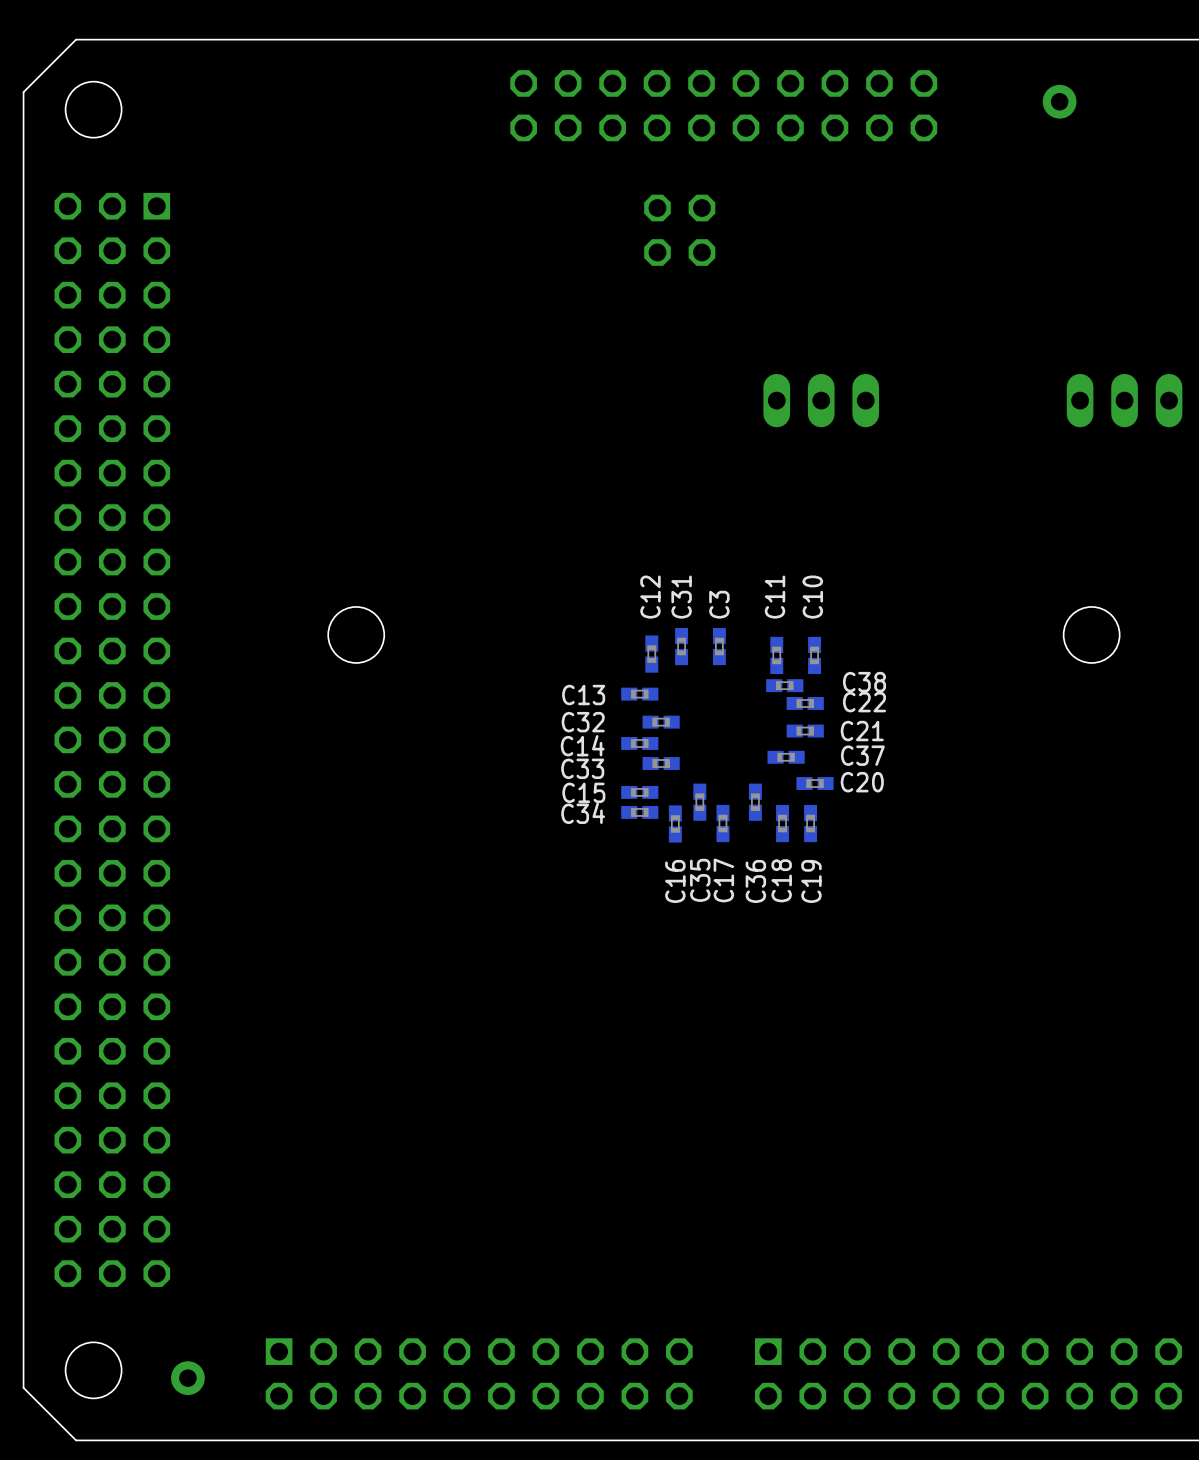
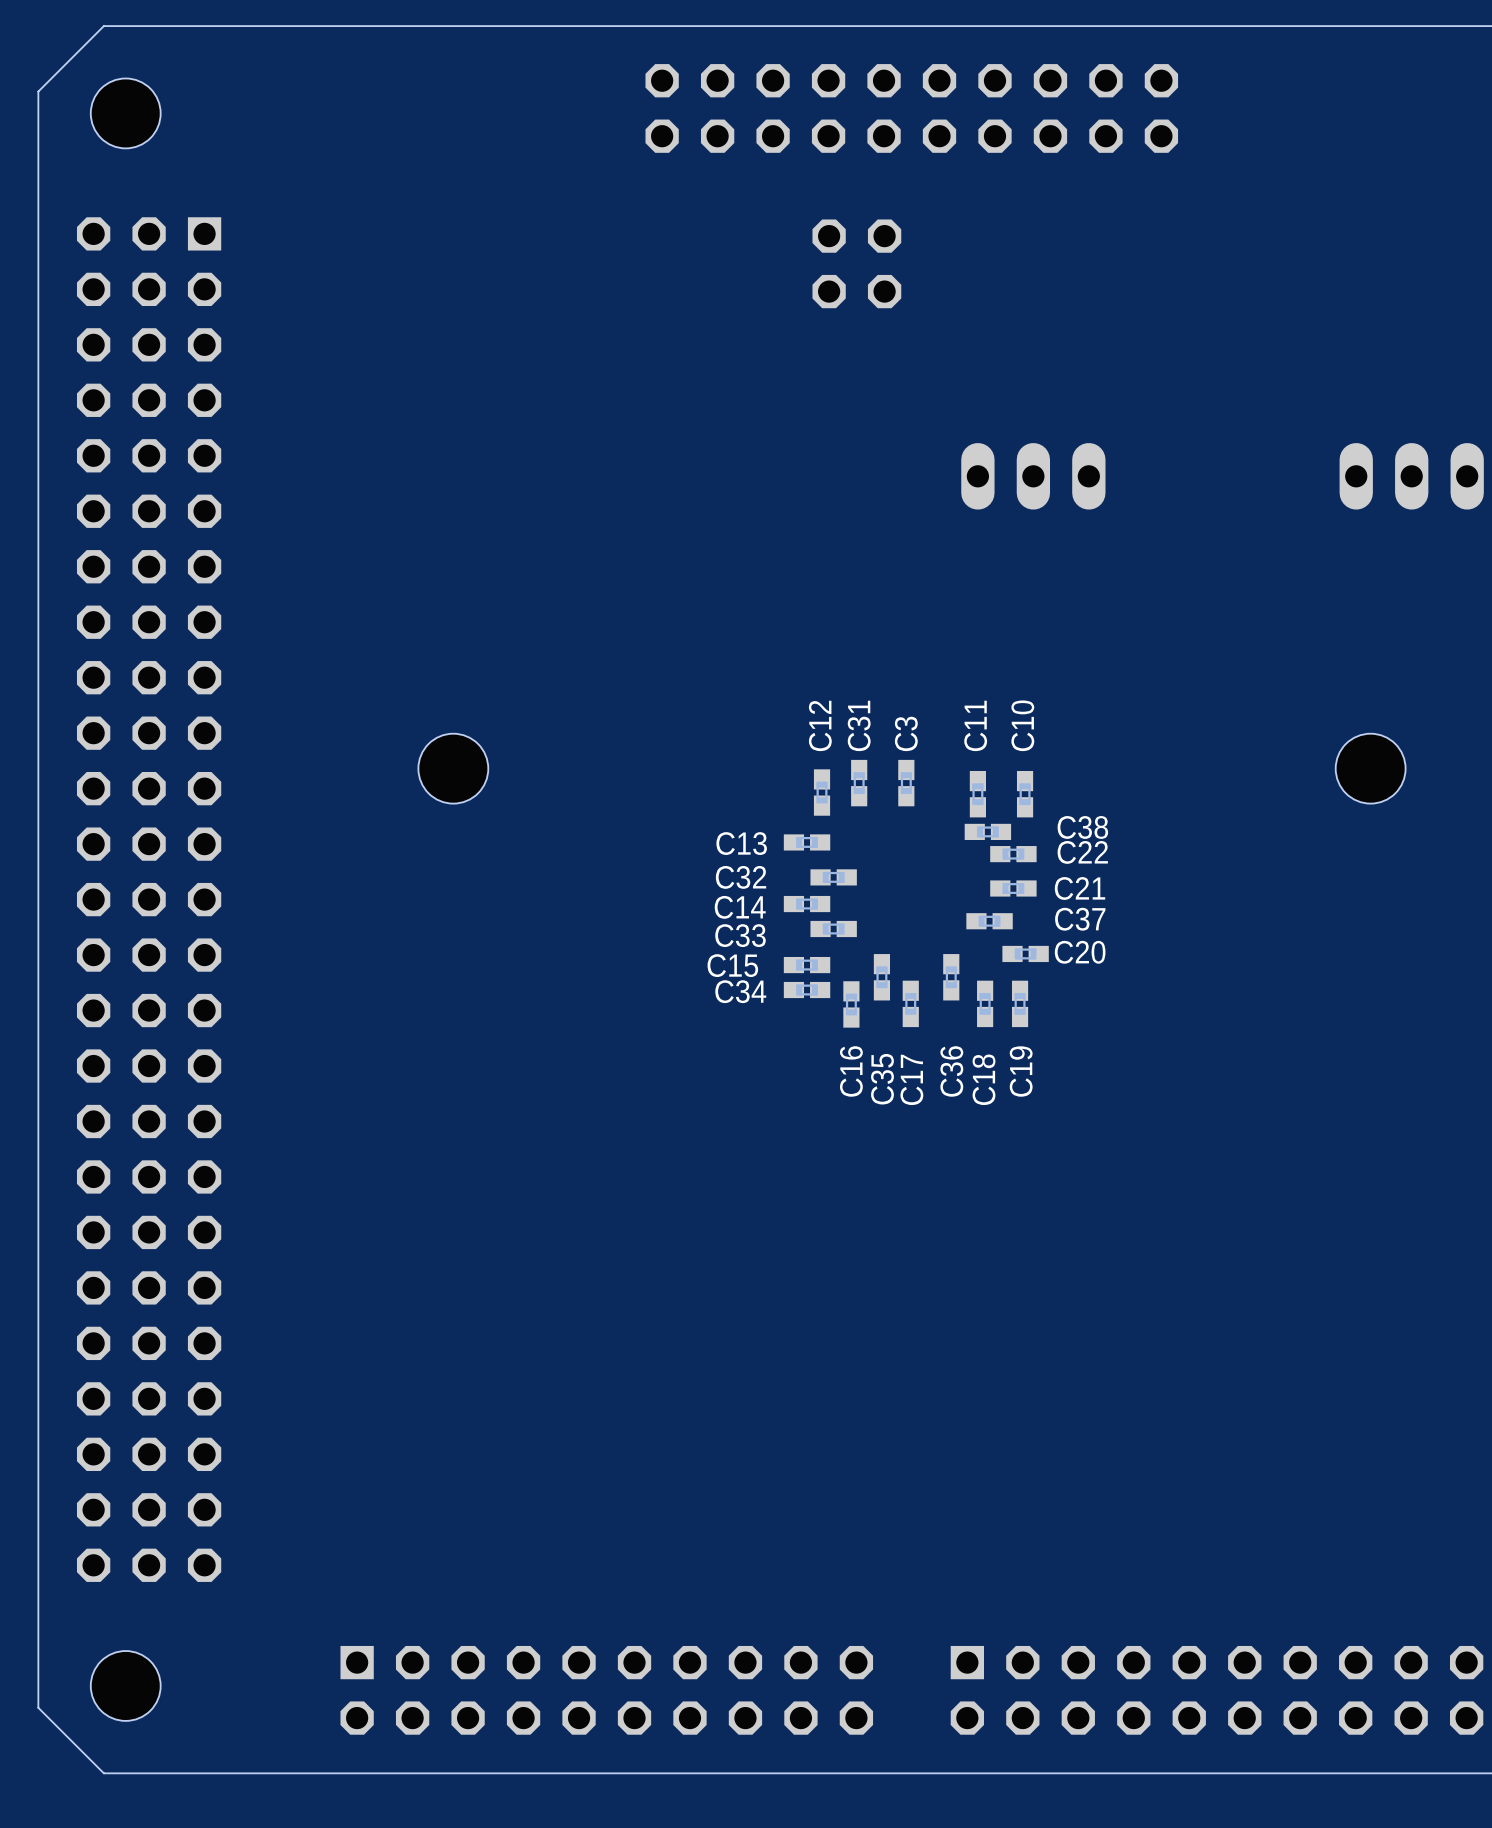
part: (1059, 101) -> none
part: (187, 1378) -> none

